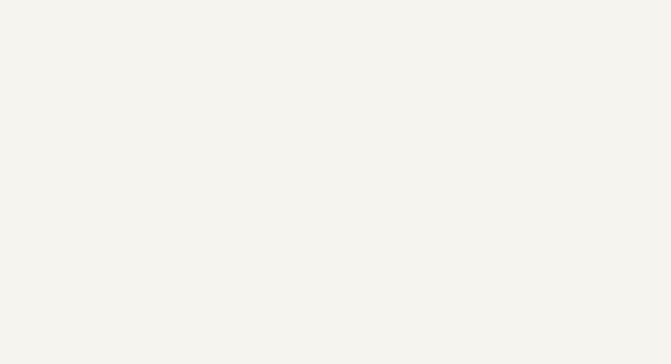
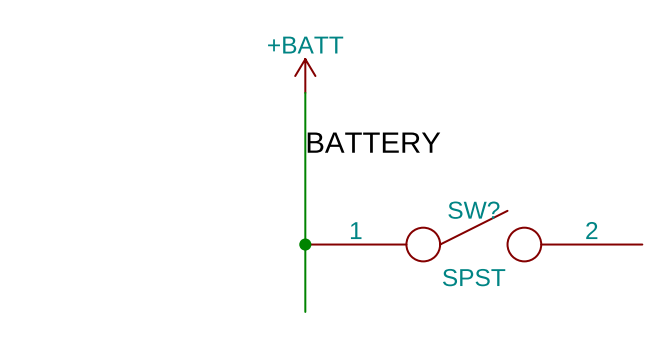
power symbol: none -> +BATT (305, 76)
wire: none -> (305, 92) (305, 311)
label: none -> BATTERY (373, 142)
SW?: none -> SPST (473, 236)
junction: none -> (305, 244)

